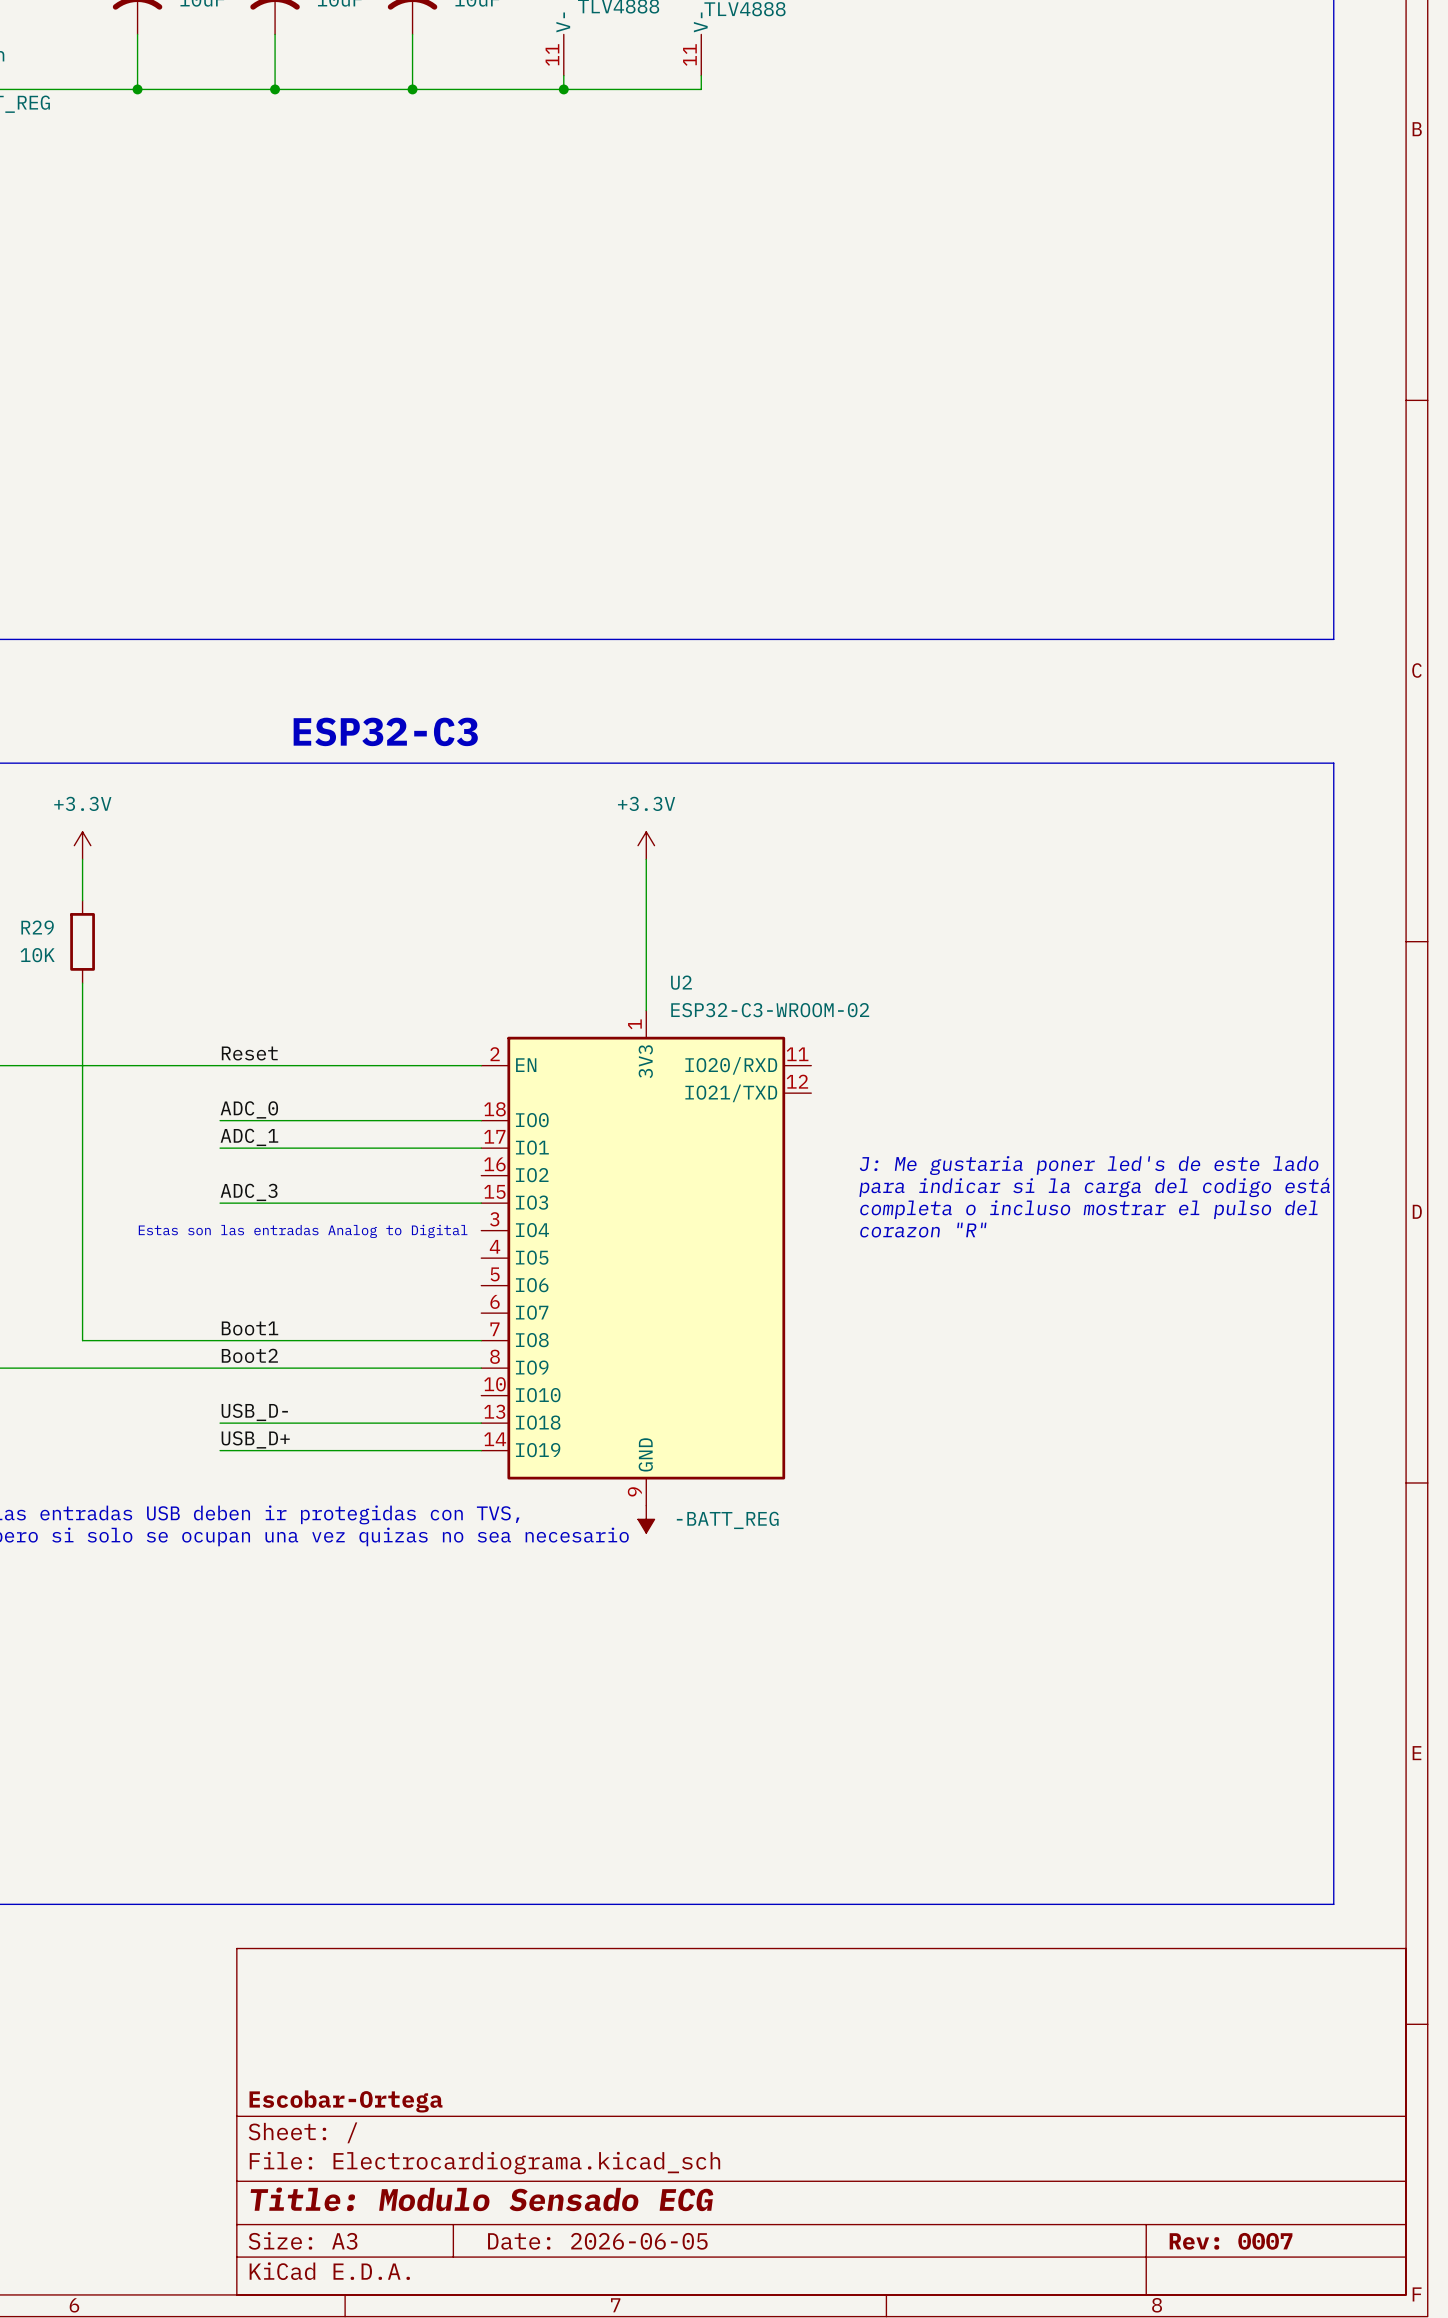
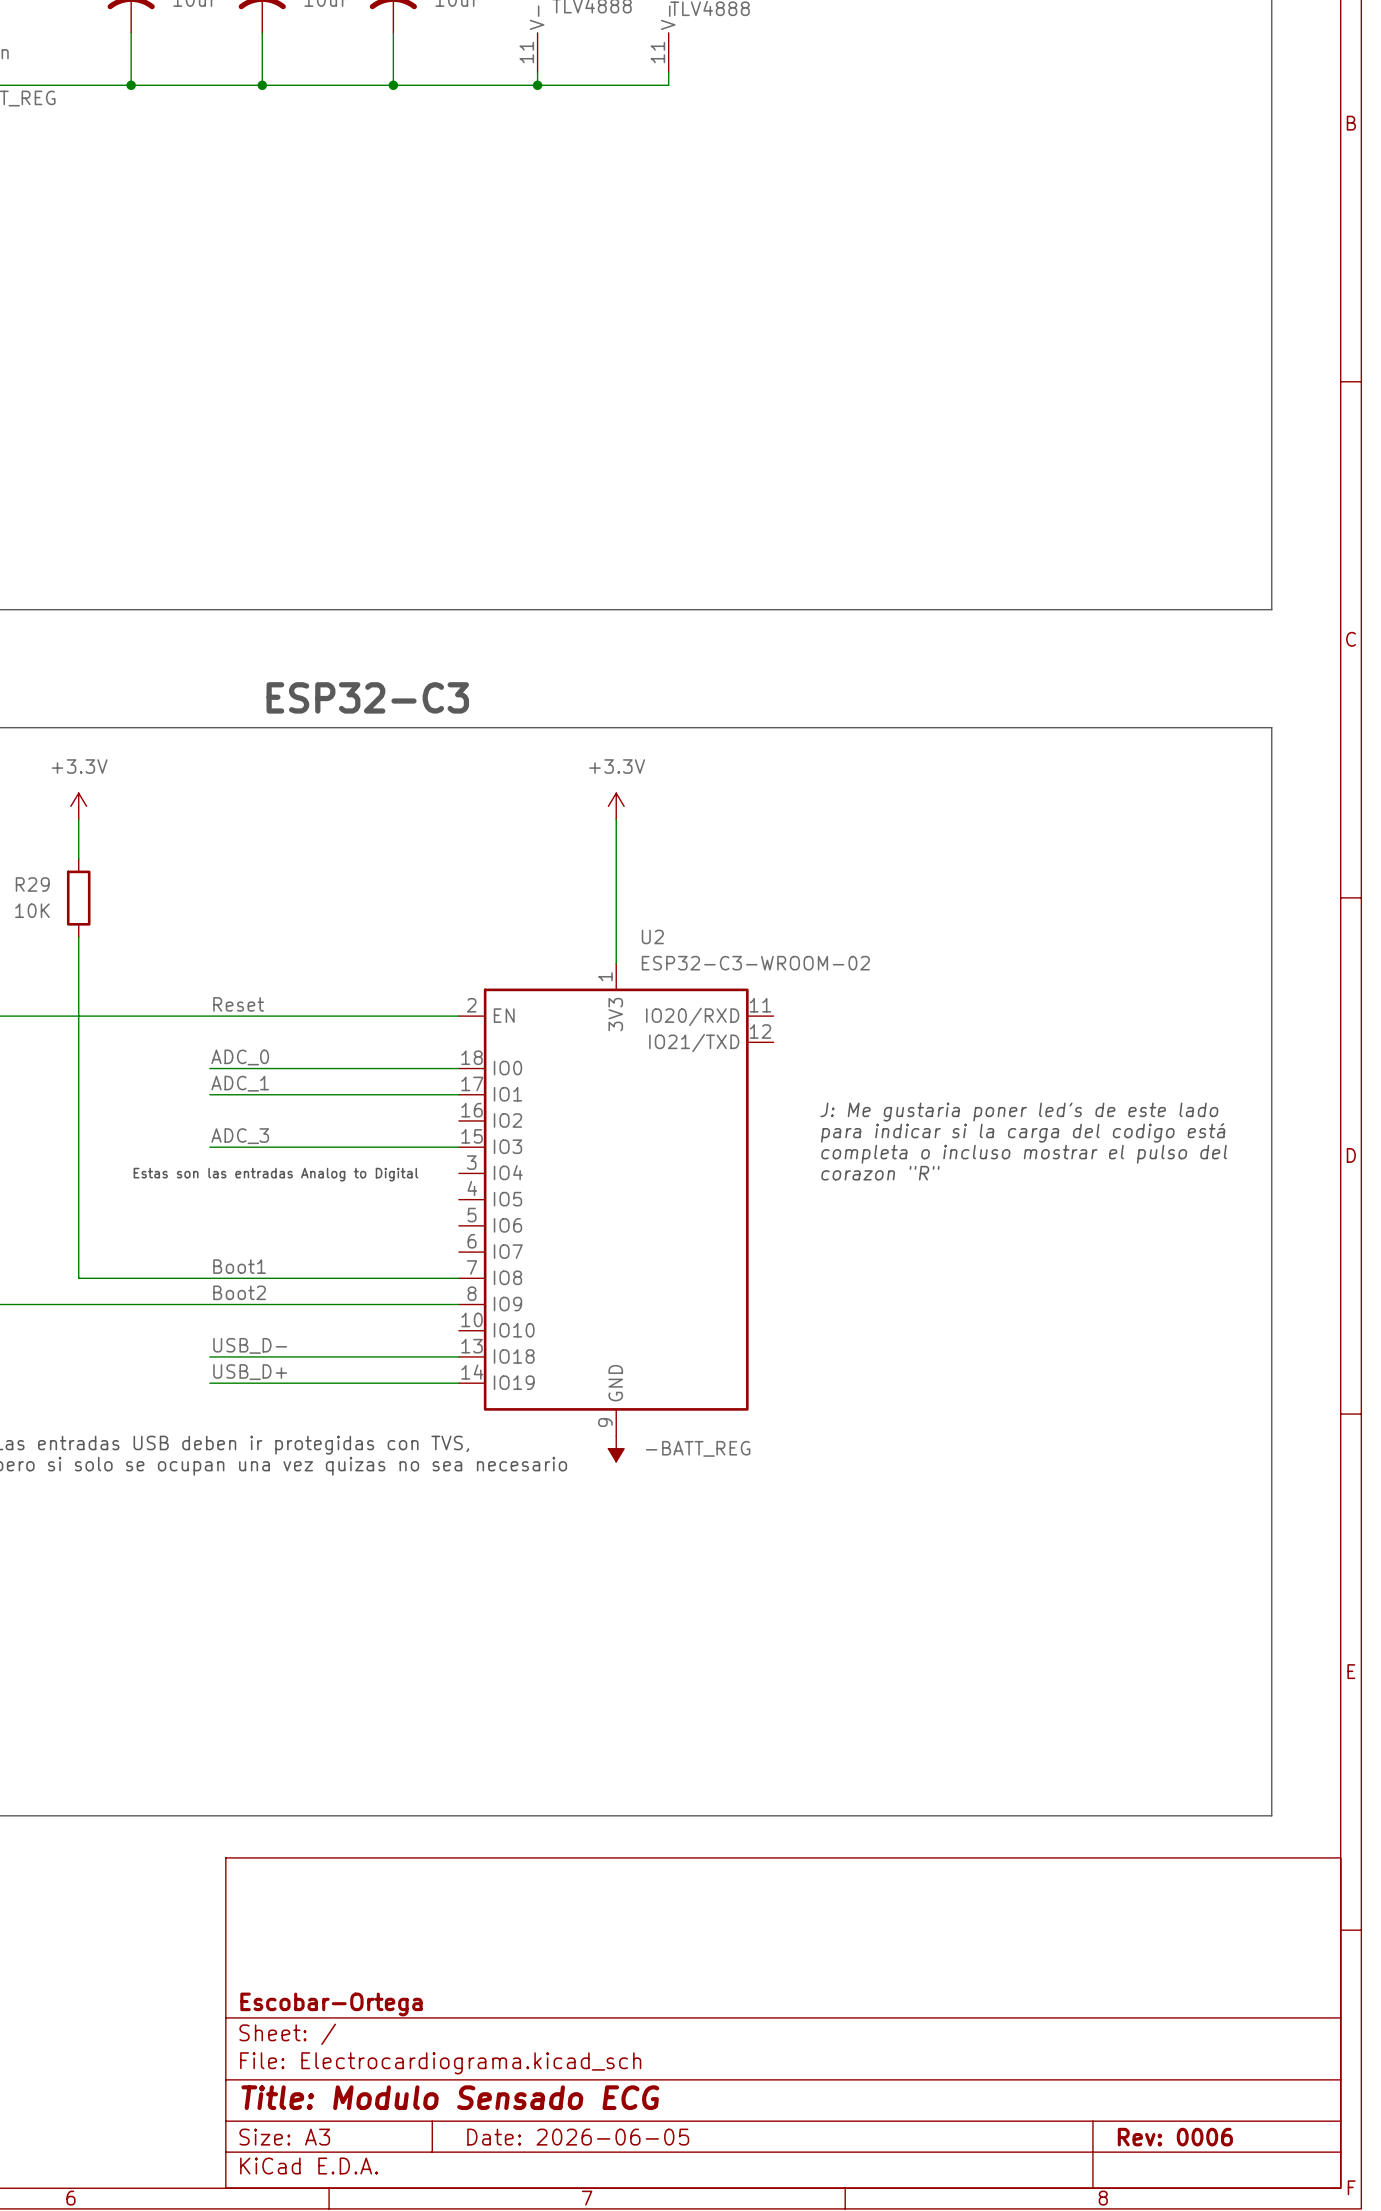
title block: Rev: 0007 (1231, 2241) -> Rev: 0006 (1175, 2137)

